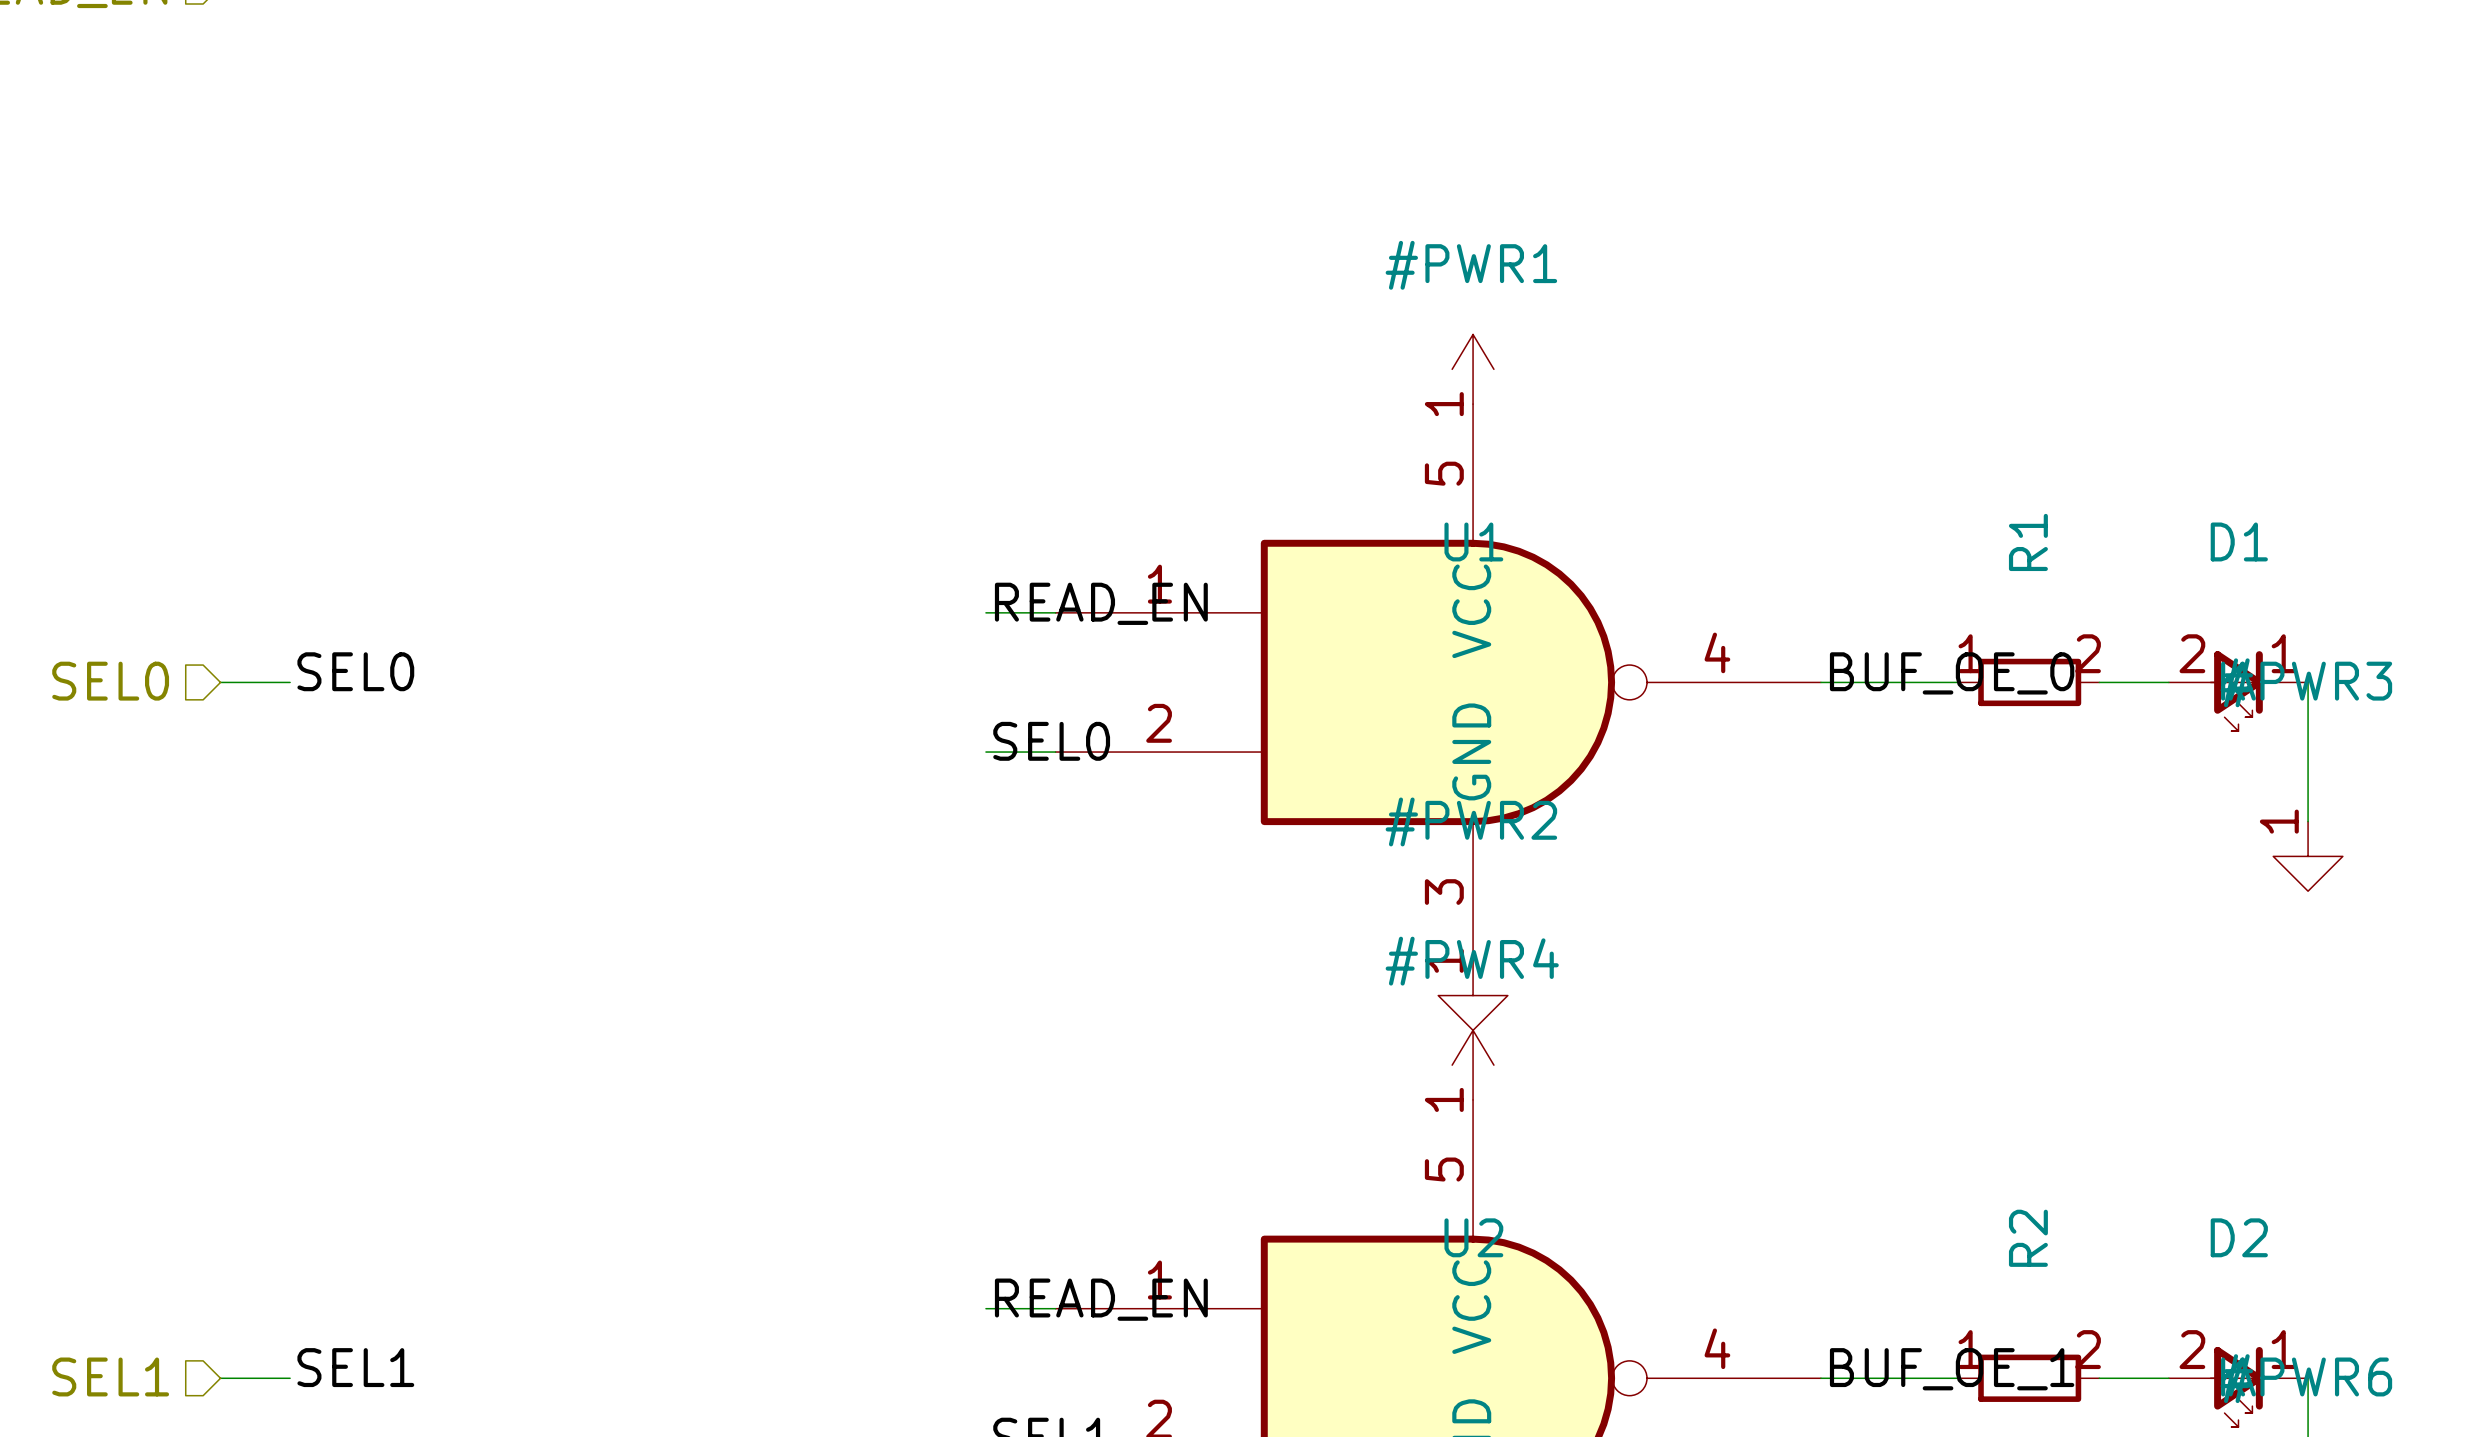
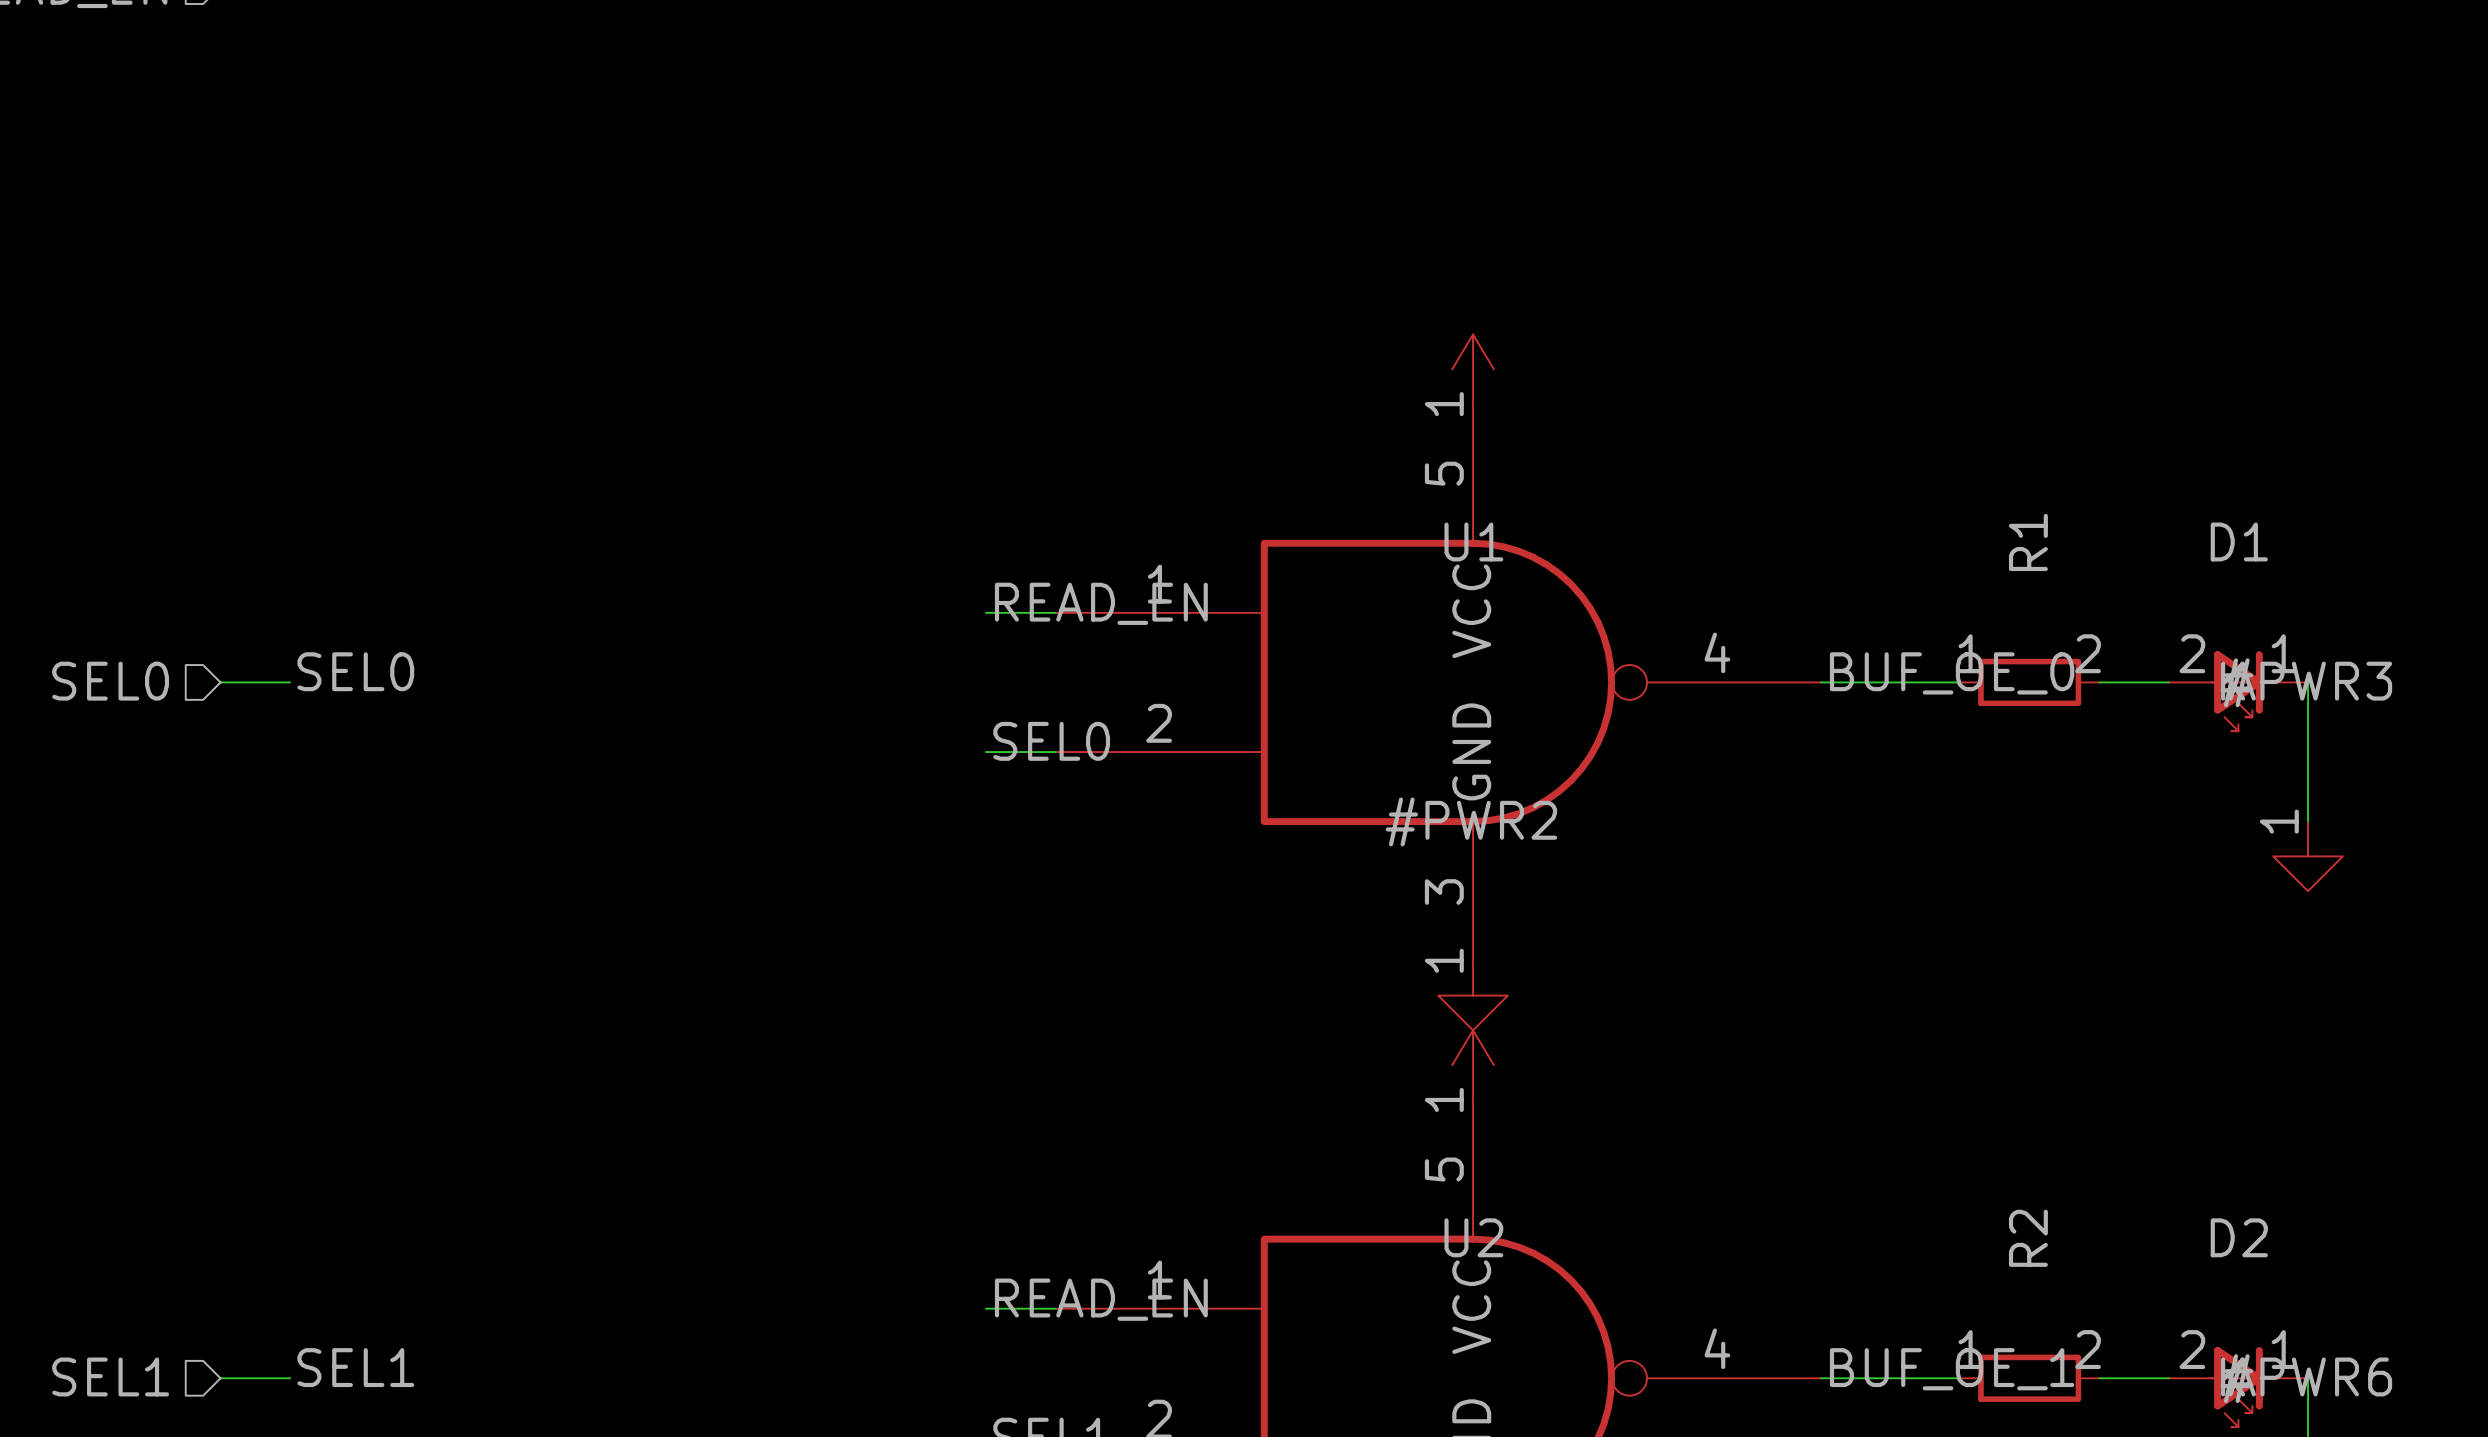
#PWR1 name: #PWR1 (1471, 265) -> none
#PWR4 name: #PWR4 (1472, 961) -> none

